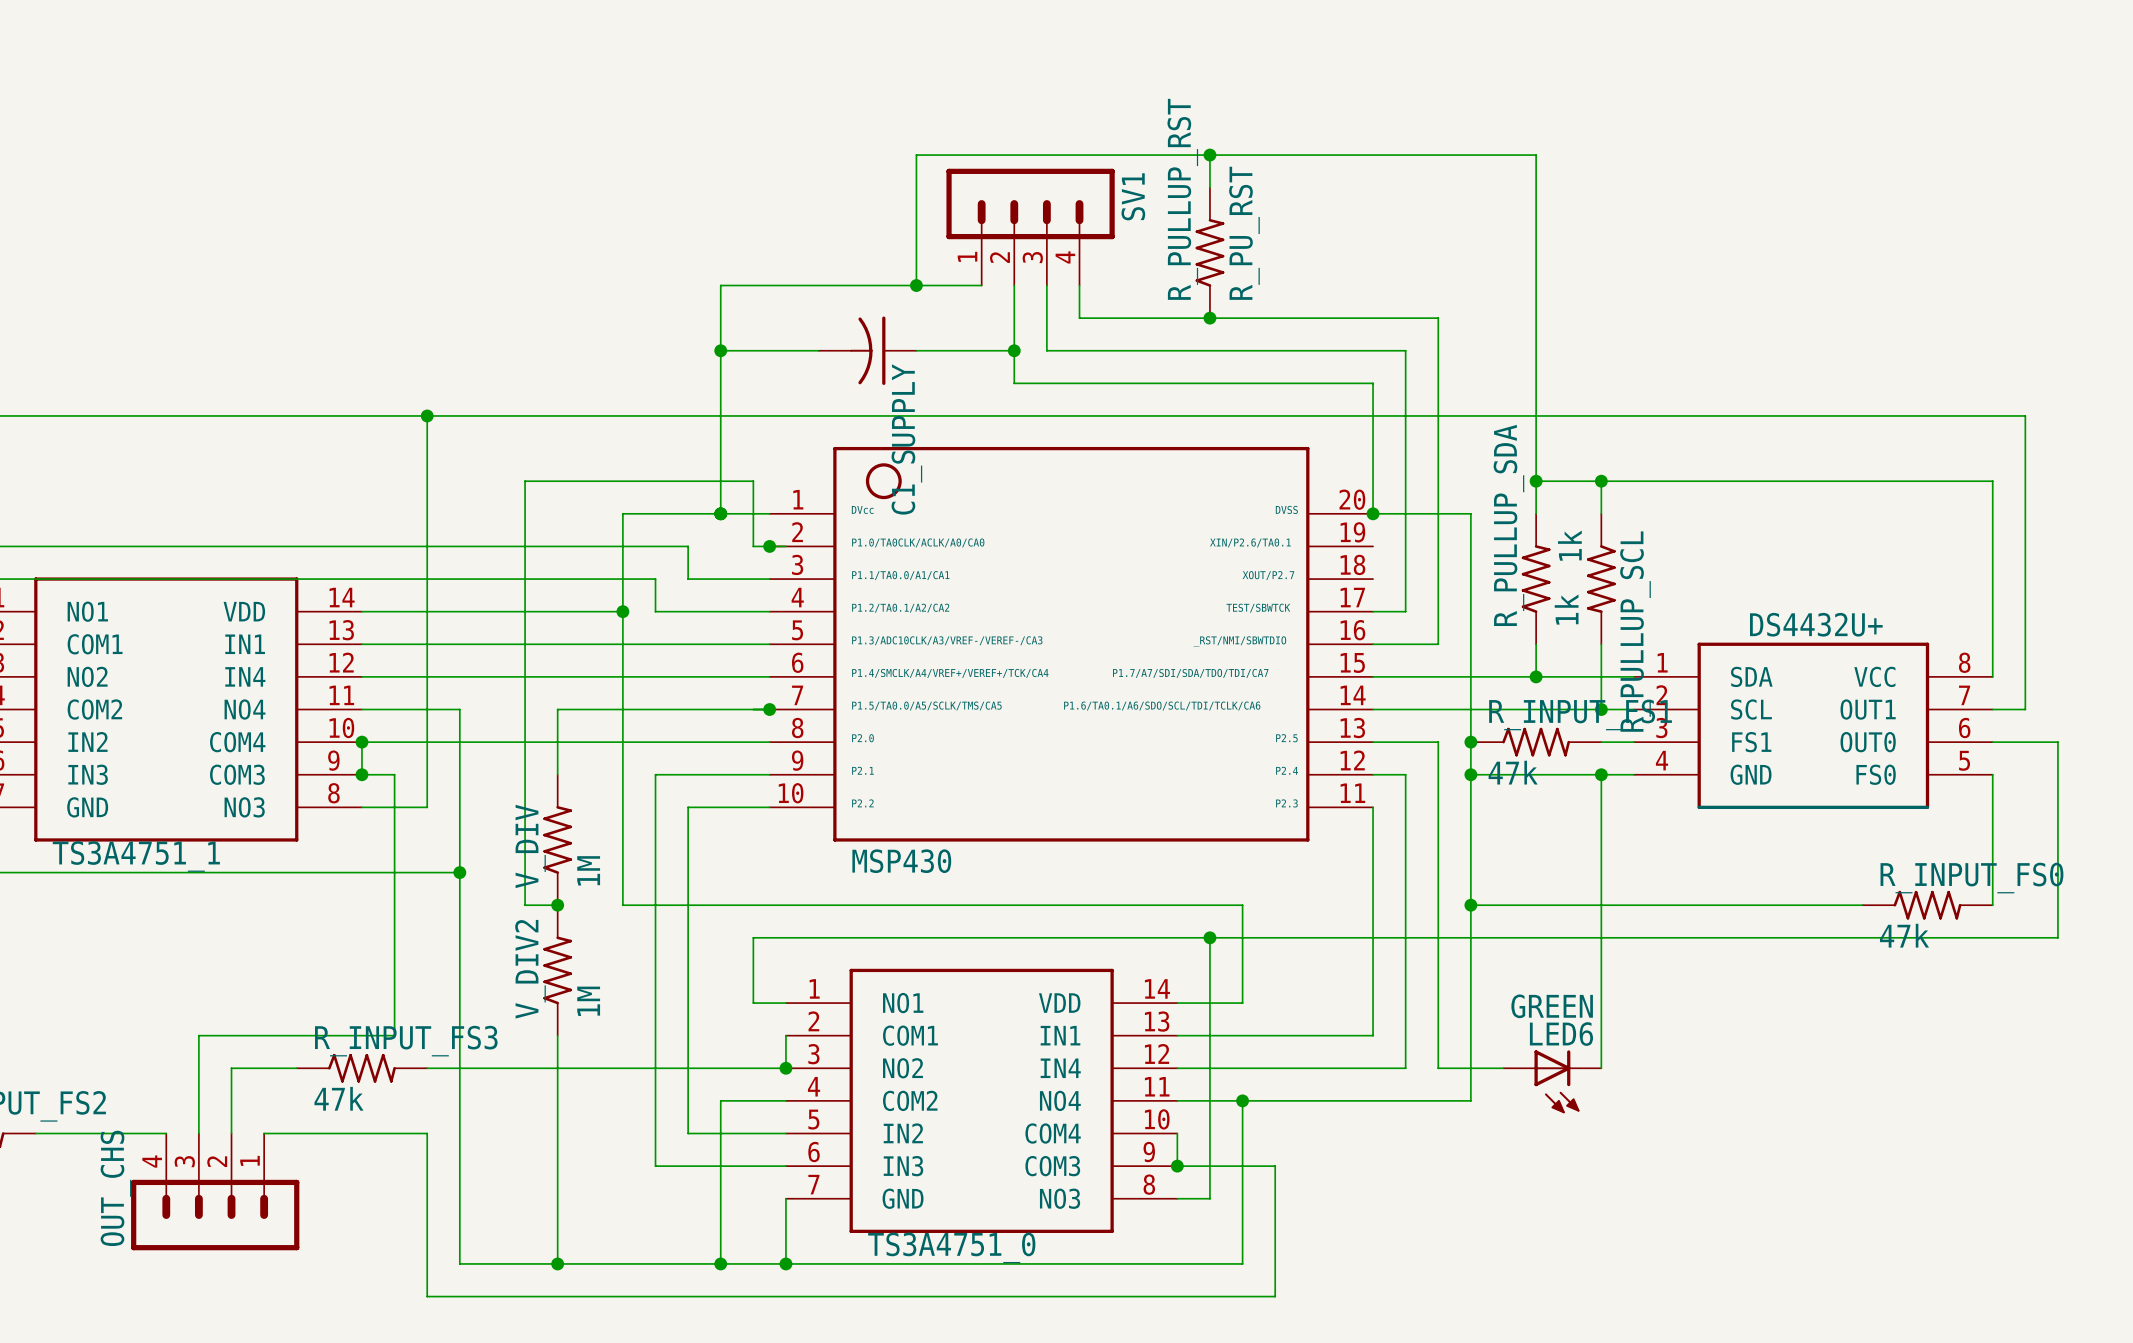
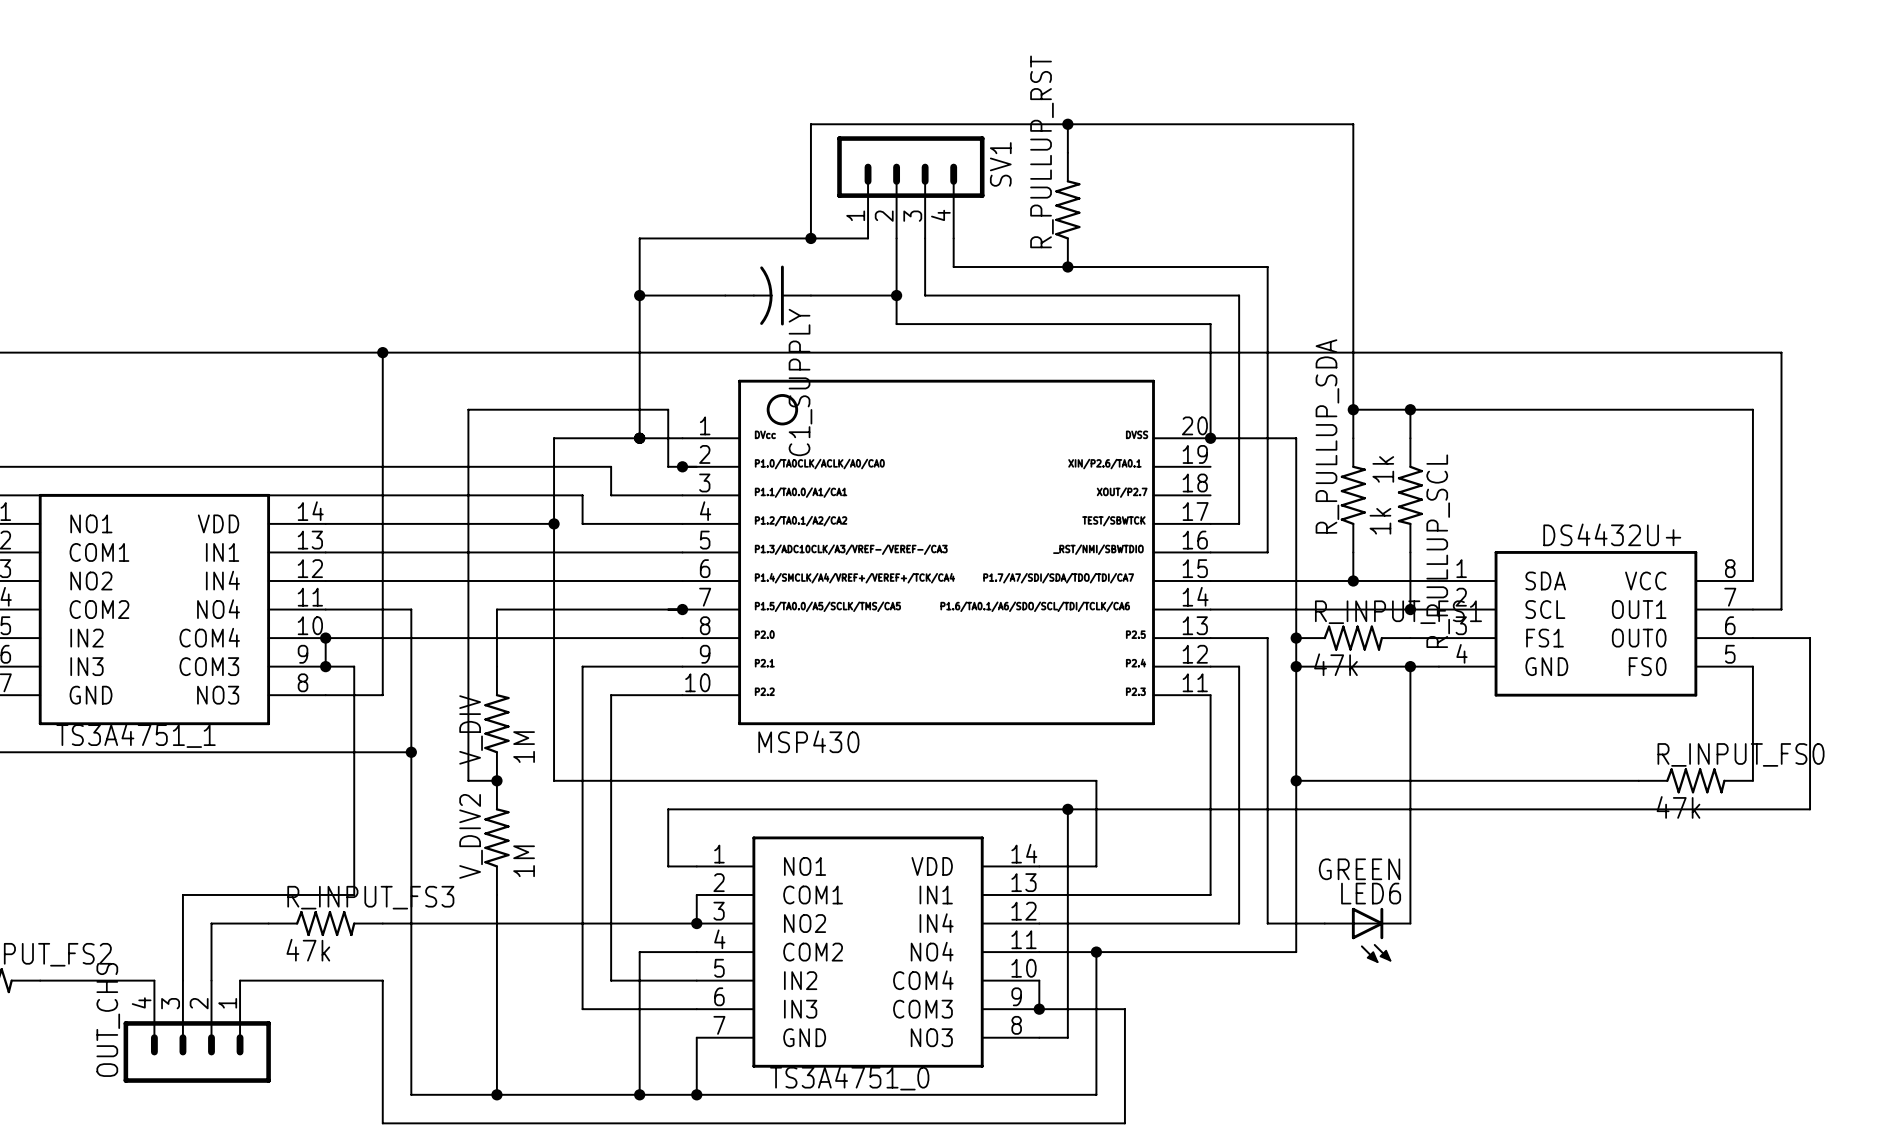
R_PULLUP_RST value: R_PU_RST (1244, 233) -> none

